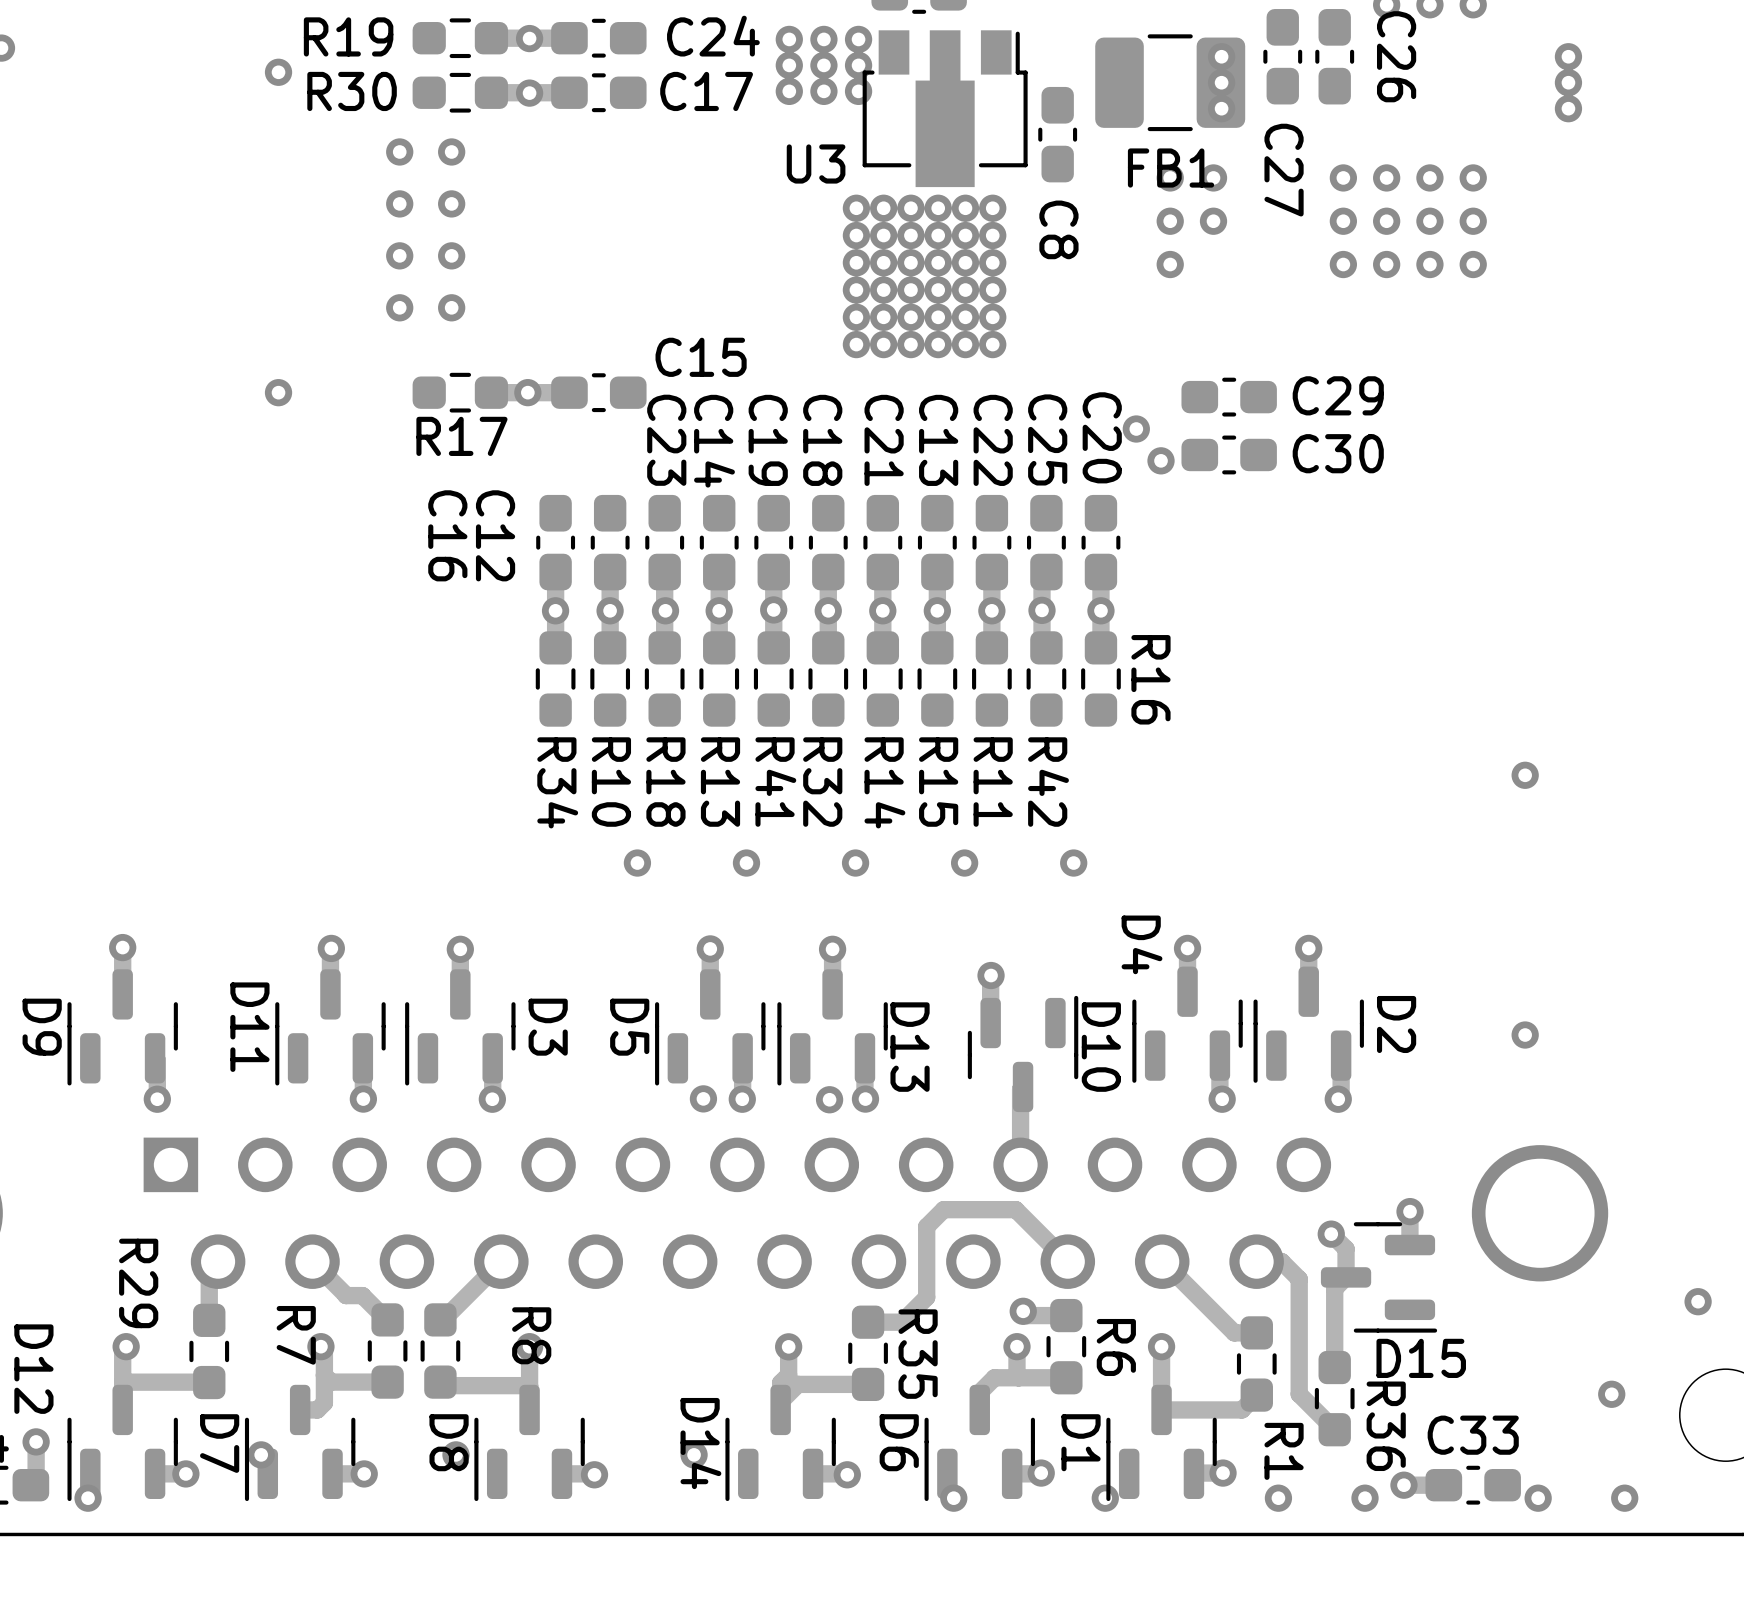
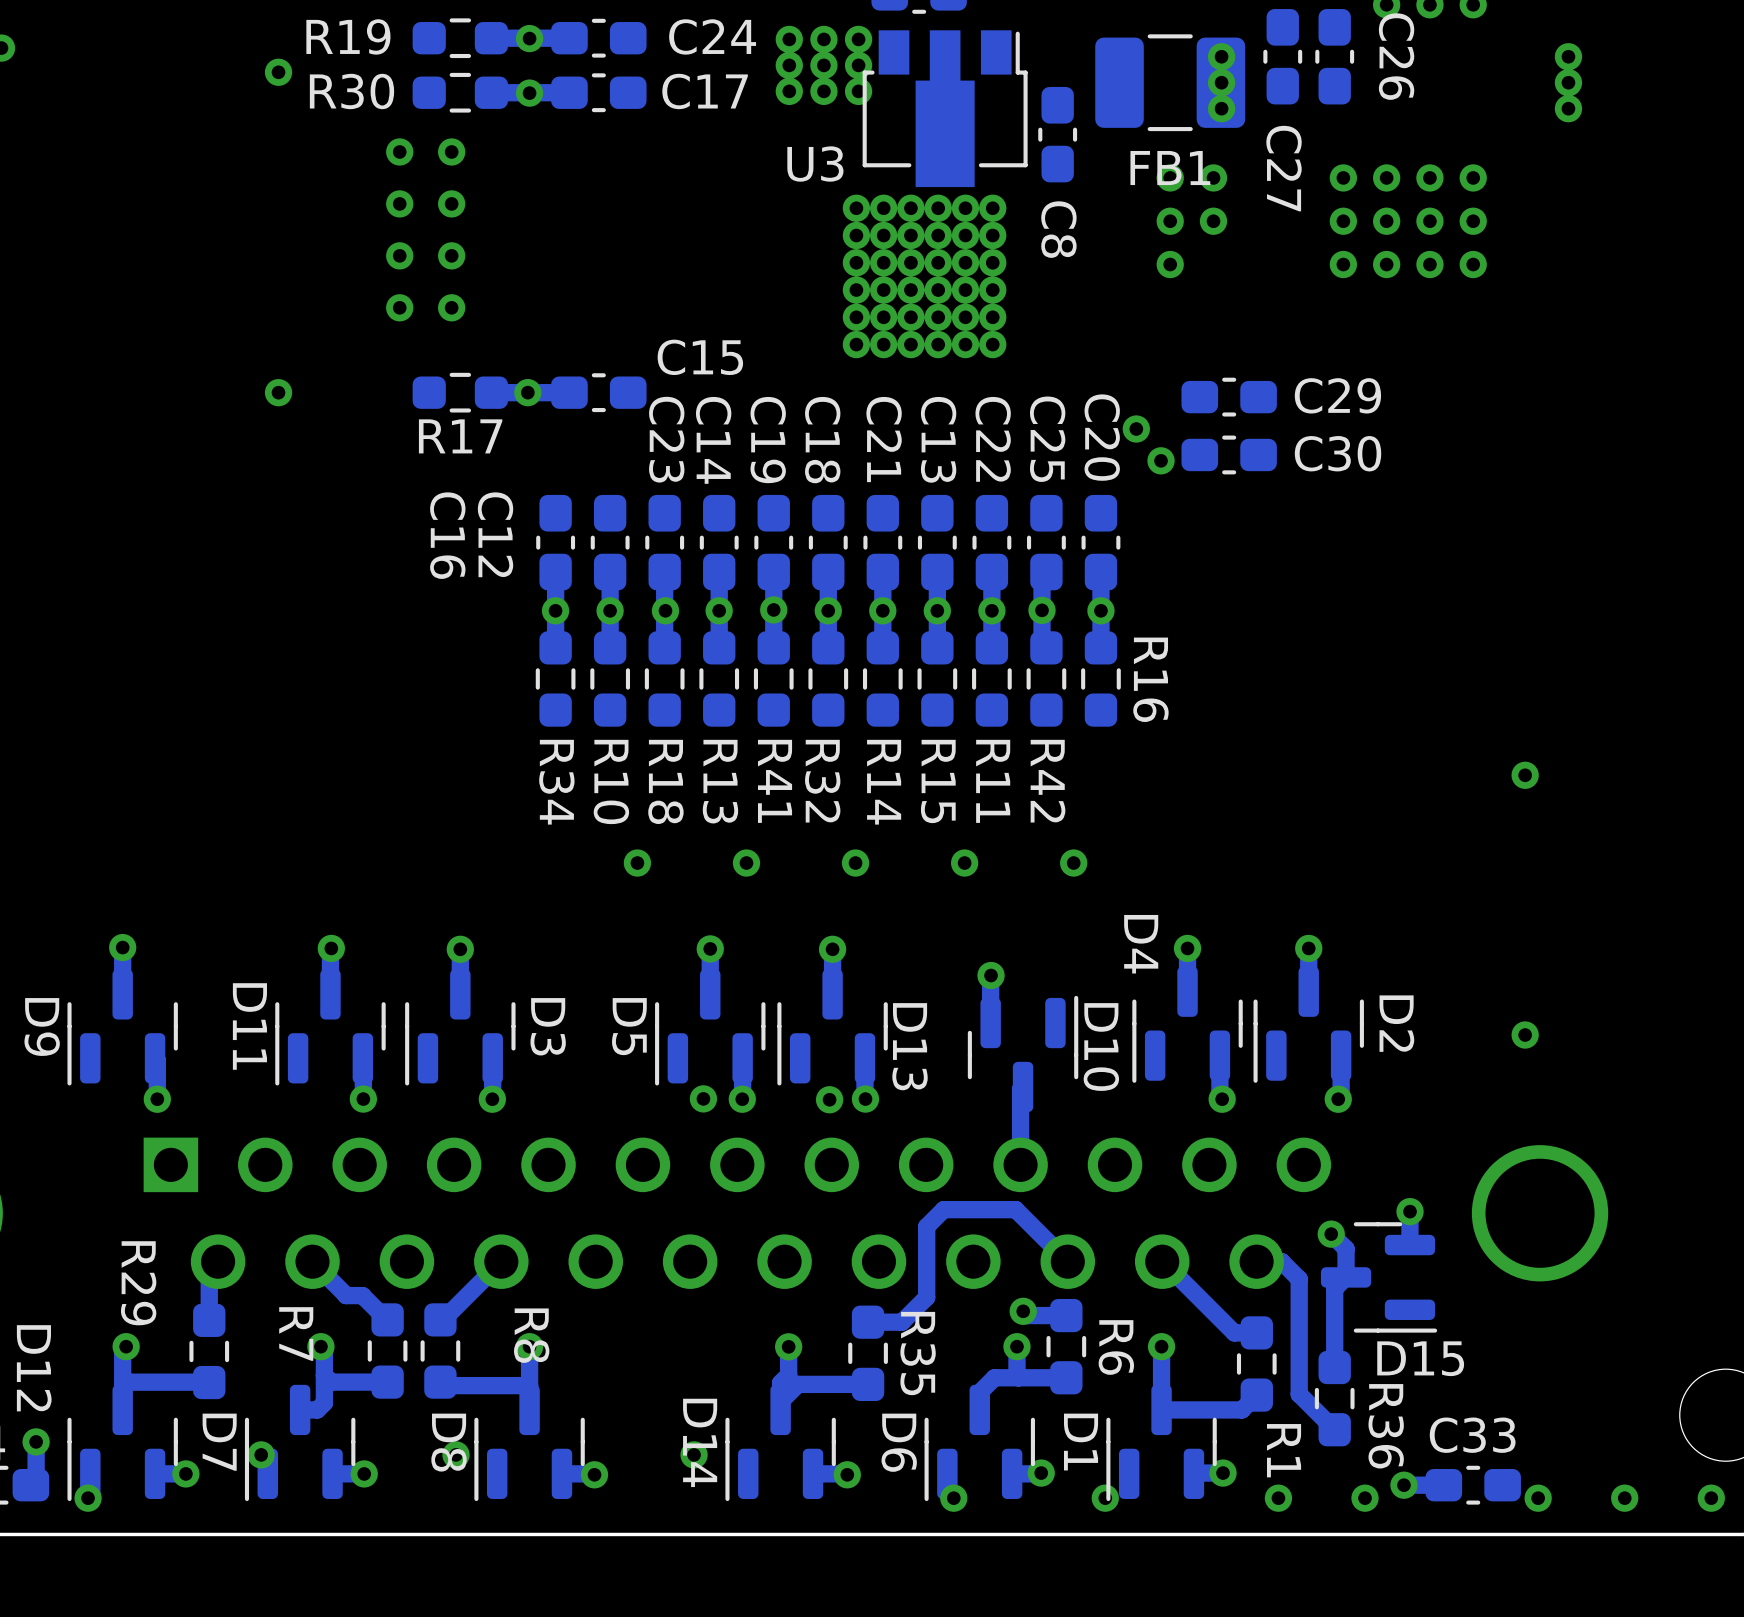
via: (1698, 1301) -> none
via: (1611, 1394) -> none
via: none -> (1711, 1498)

